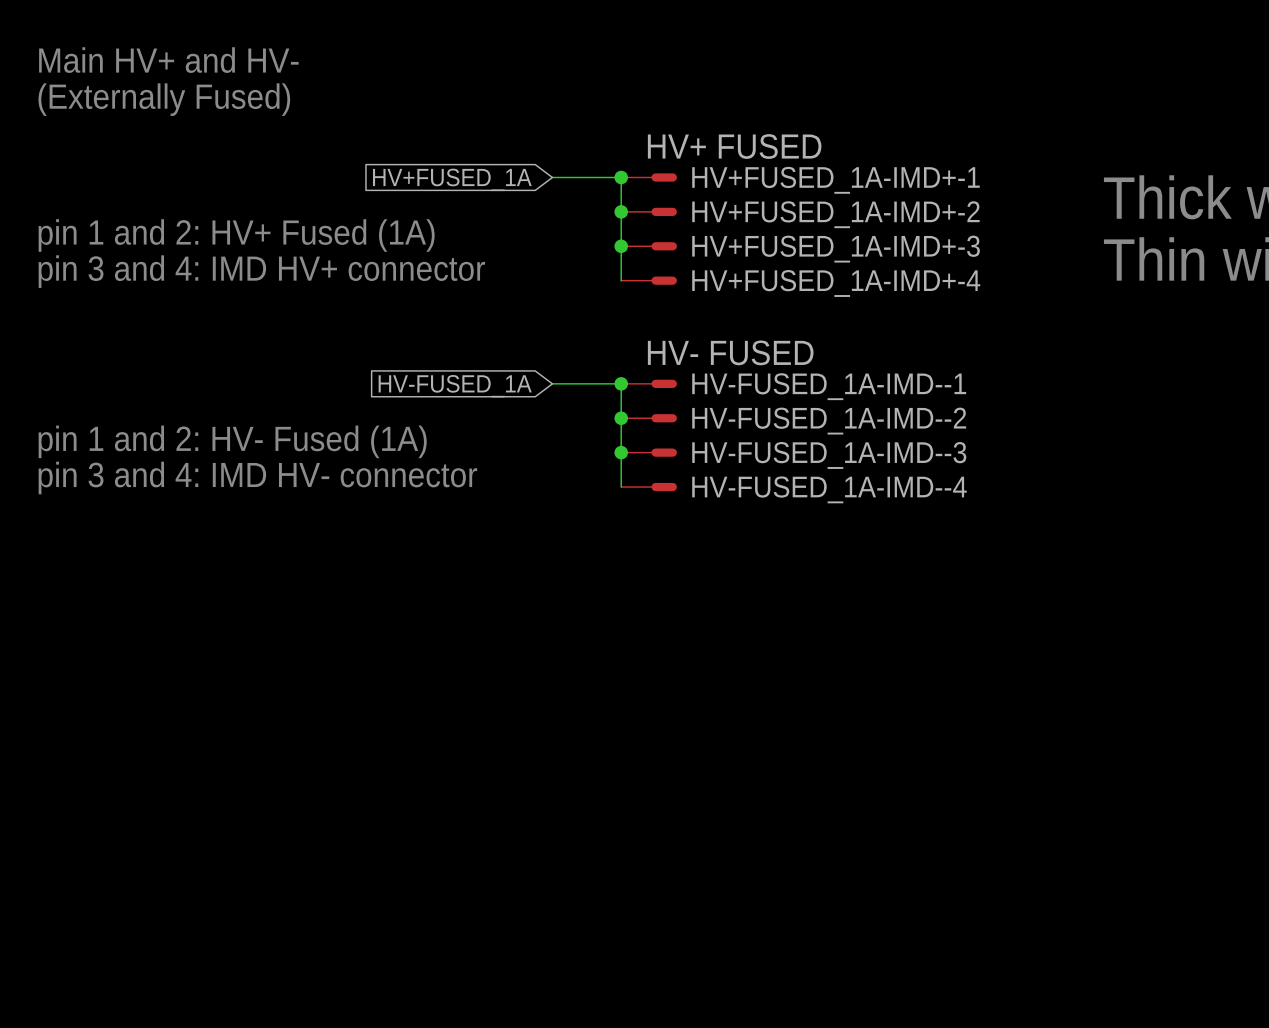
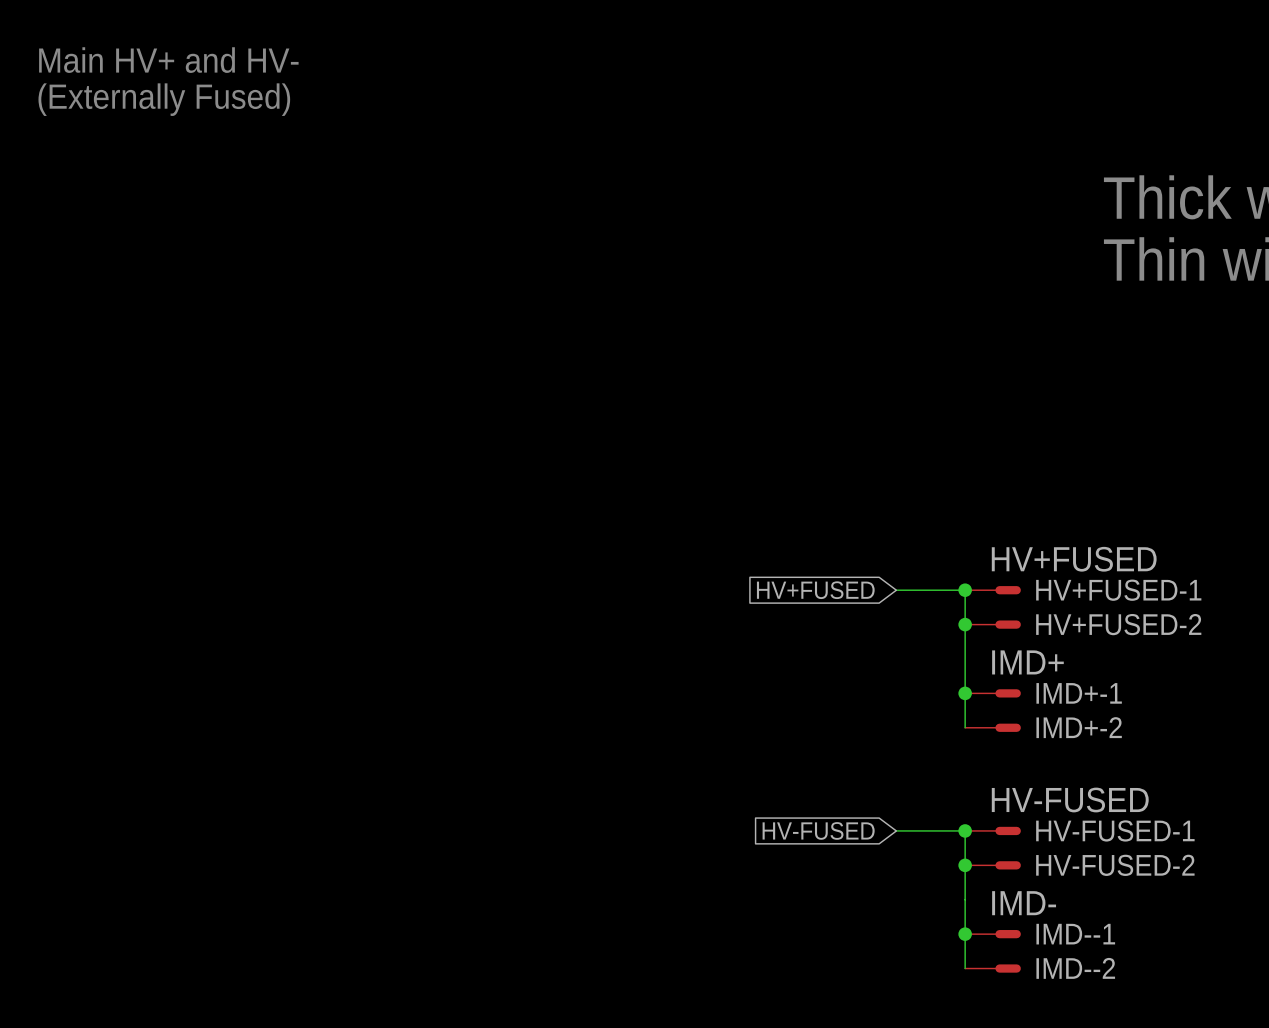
wire: (552, 177) (621, 177) (621, 280) -> none
junction: (621, 177) -> none
HV+FUSED_1A-IMD+-1: HV+ FUSED (649, 177) -> none
global label: HV+FUSED_1A (452, 179) -> none
junction: (621, 211) -> none
HV+FUSED_1A-IMD+-2: (649, 211) -> none
text: pin 1 and 2: HV+ Fused (1A) (236, 235) -> none
junction: (621, 246) -> none
HV+FUSED_1A-IMD+-3: (649, 246) -> none
text: pin 3 and 4: IMD HV+ connector (261, 271) -> none
HV+FUSED_1A-IMD+-4: (649, 280) -> none
wire: (552, 383) (621, 383) (621, 487) -> none
junction: (621, 383) -> none
HV-FUSED_1A-IMD--1: HV- FUSED (649, 383) -> none
global label: HV-FUSED_1A (455, 386) -> none
junction: (621, 418) -> none
HV-FUSED_1A-IMD--2: (649, 418) -> none
text: pin 1 and 2: HV- Fused (1A) (232, 441) -> none
junction: (621, 452) -> none
HV-FUSED_1A-IMD--3: (649, 452) -> none
text: pin 3 and 4: IMD HV- connector (257, 477) -> none
HV-FUSED_1A-IMD--4: (649, 487) -> none
global label: none -> HV+FUSED (815, 590)
wire: none -> (896, 590) (965, 590) (965, 727)
junction: none -> (965, 590)
HV+FUSED-1: none -> HV+FUSED (993, 590)
junction: none -> (965, 624)
HV+FUSED-2: none -> (993, 624)
junction: none -> (965, 693)
IMD+-1: none -> IMD+ (993, 693)
IMD+-2: none -> (993, 727)
global label: none -> HV-FUSED (818, 830)
wire: none -> (896, 830) (965, 830) (965, 968)
junction: none -> (965, 830)
HV-FUSED-1: none -> HV-FUSED (993, 830)
junction: none -> (965, 865)
HV-FUSED-2: none -> (993, 865)
junction: none -> (965, 934)
IMD--1: none -> IMD- (993, 934)
IMD--2: none -> (993, 968)

